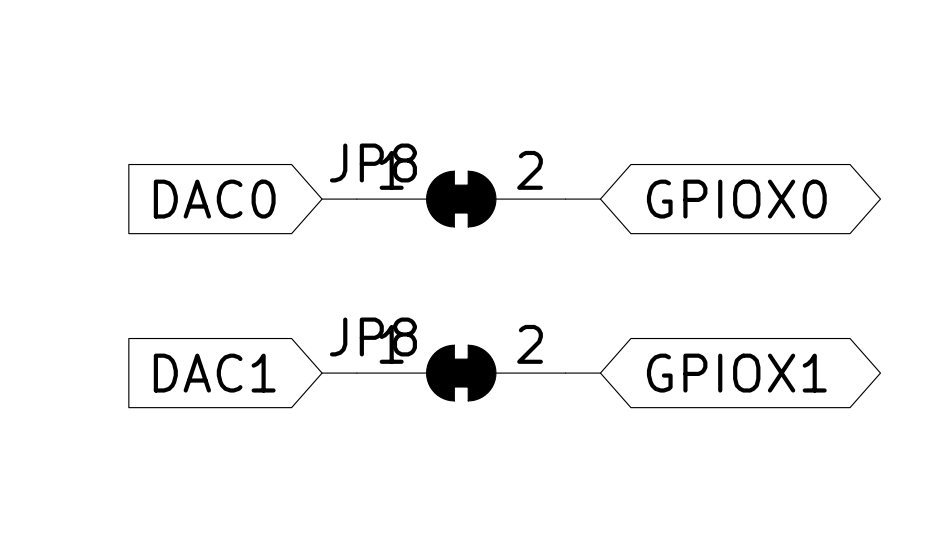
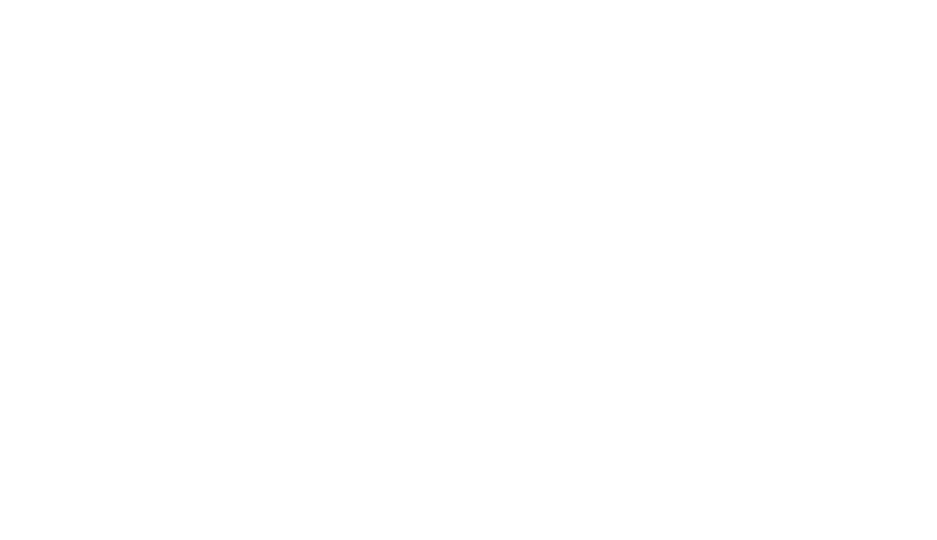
global label: DAC0 (214, 199) -> none
wire: (322, 199) (356, 199) -> none
JP8: (461, 199) -> none
wire: (565, 199) (600, 199) -> none
global label: GPIOX0 (736, 199) -> none
global label: DAC1 (214, 373) -> none
wire: (322, 373) (356, 373) -> none
JP8: (461, 373) -> none
wire: (565, 373) (600, 373) -> none
global label: GPIOX1 (736, 373) -> none

